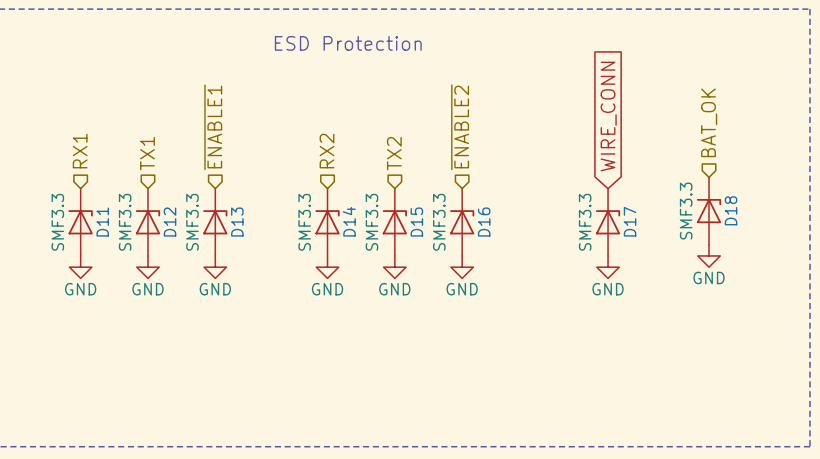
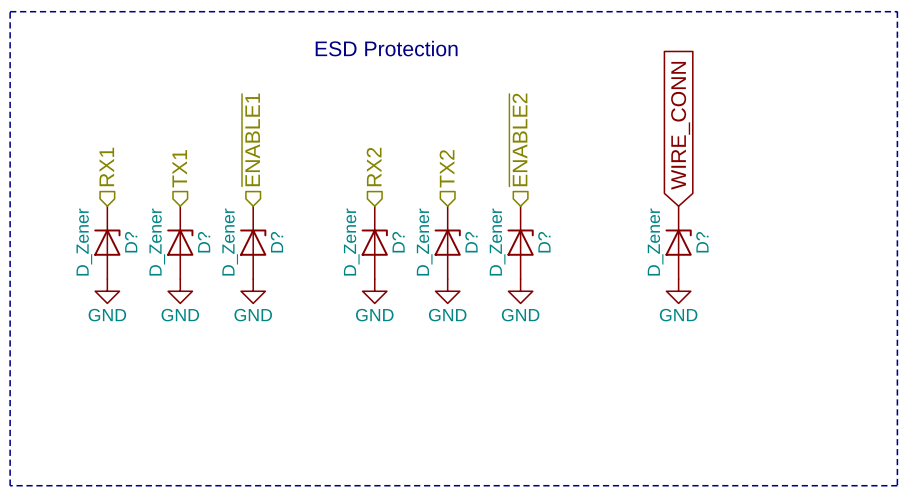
hierarchical label: BAT_OK (709, 122) -> none
D18: SMF3.3 (709, 211) -> none
D14 name: D14 (349, 221) -> D? (398, 242)
D17 name: D17 (630, 221) -> D? (702, 242)
D11 value: SMF3.3 (57, 222) -> D_Zener (84, 242)
D11 name: D11 (102, 222) -> D? (131, 242)
D12 value: SMF3.3 (125, 222) -> D_Zener (157, 242)
D12 name: D12 (170, 222) -> D? (204, 242)
D13 value: SMF3.3 (192, 222) -> D_Zener (230, 242)
D13 name: D13 (237, 222) -> D? (276, 242)
D14 value: SMF3.3 (304, 222) -> D_Zener (351, 242)
D15 value: SMF3.3 (371, 222) -> D_Zener (424, 242)
D15 name: D15 (416, 222) -> D? (471, 242)
D16 value: SMF3.3 (439, 222) -> D_Zener (497, 242)
D16 name: D16 (484, 222) -> D? (544, 242)
D17 value: SMF3.3 (585, 222) -> D_Zener (655, 242)
power symbol: GND (709, 255) -> none

